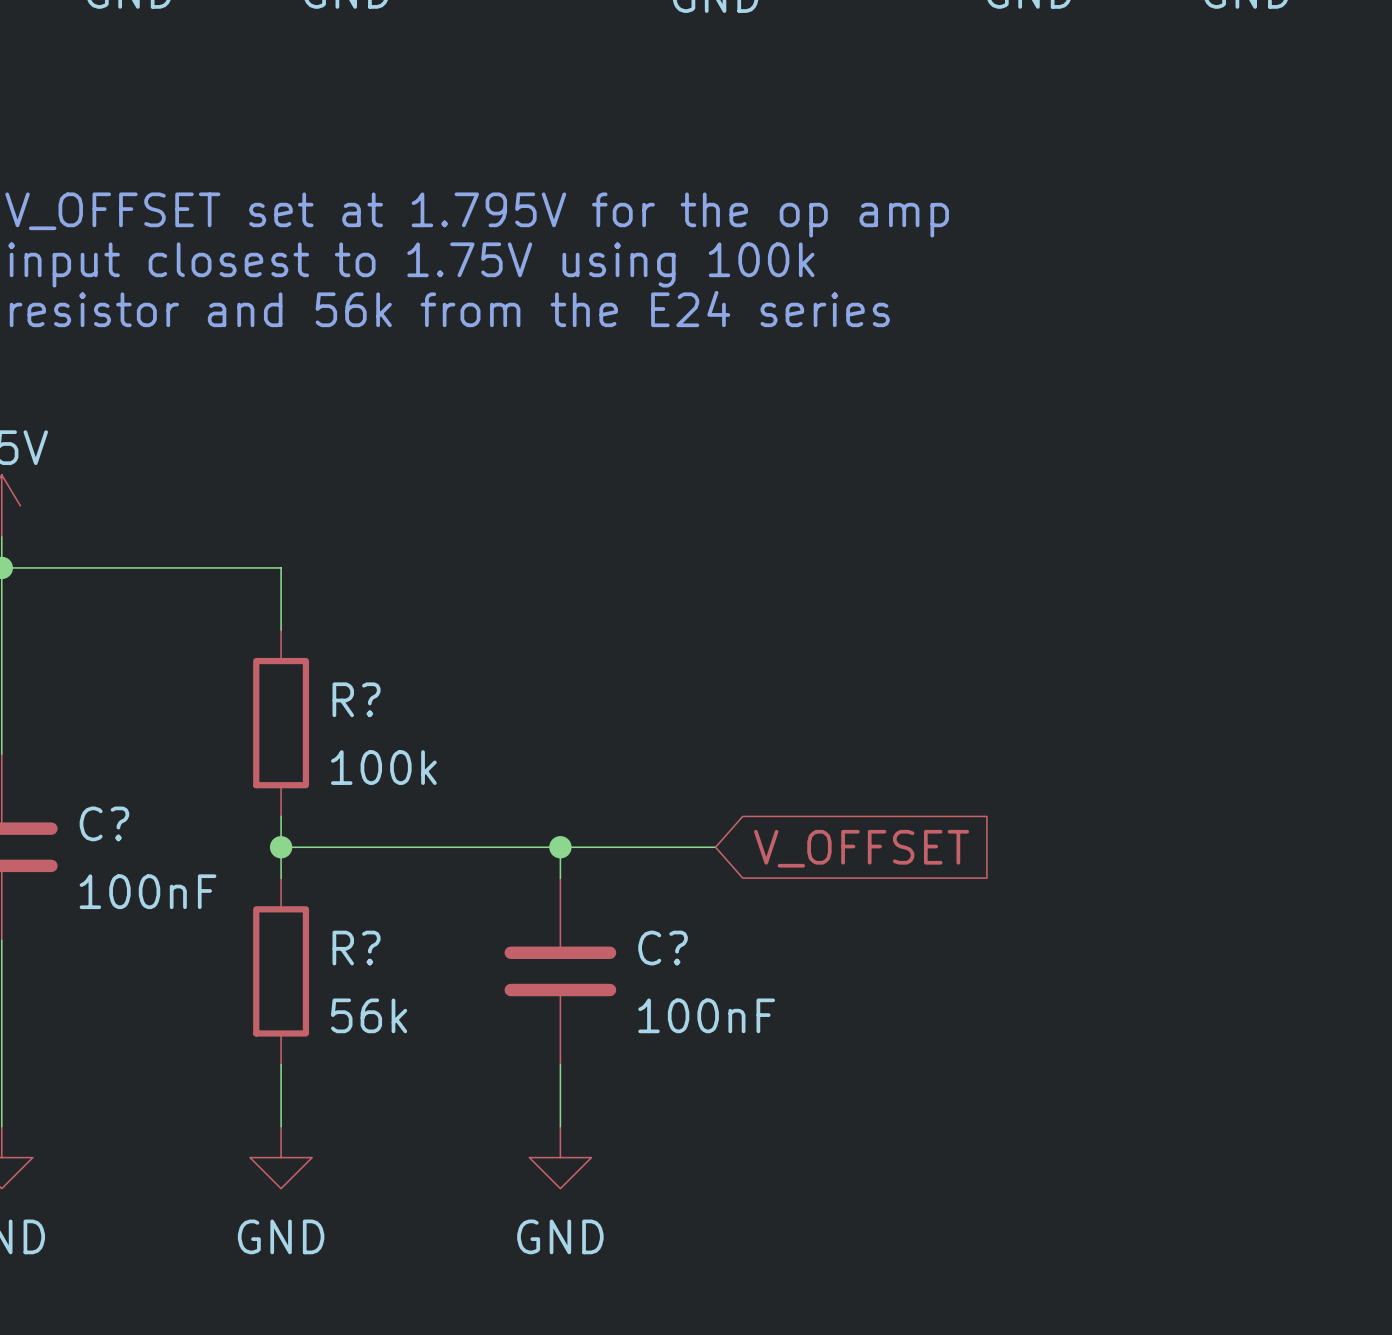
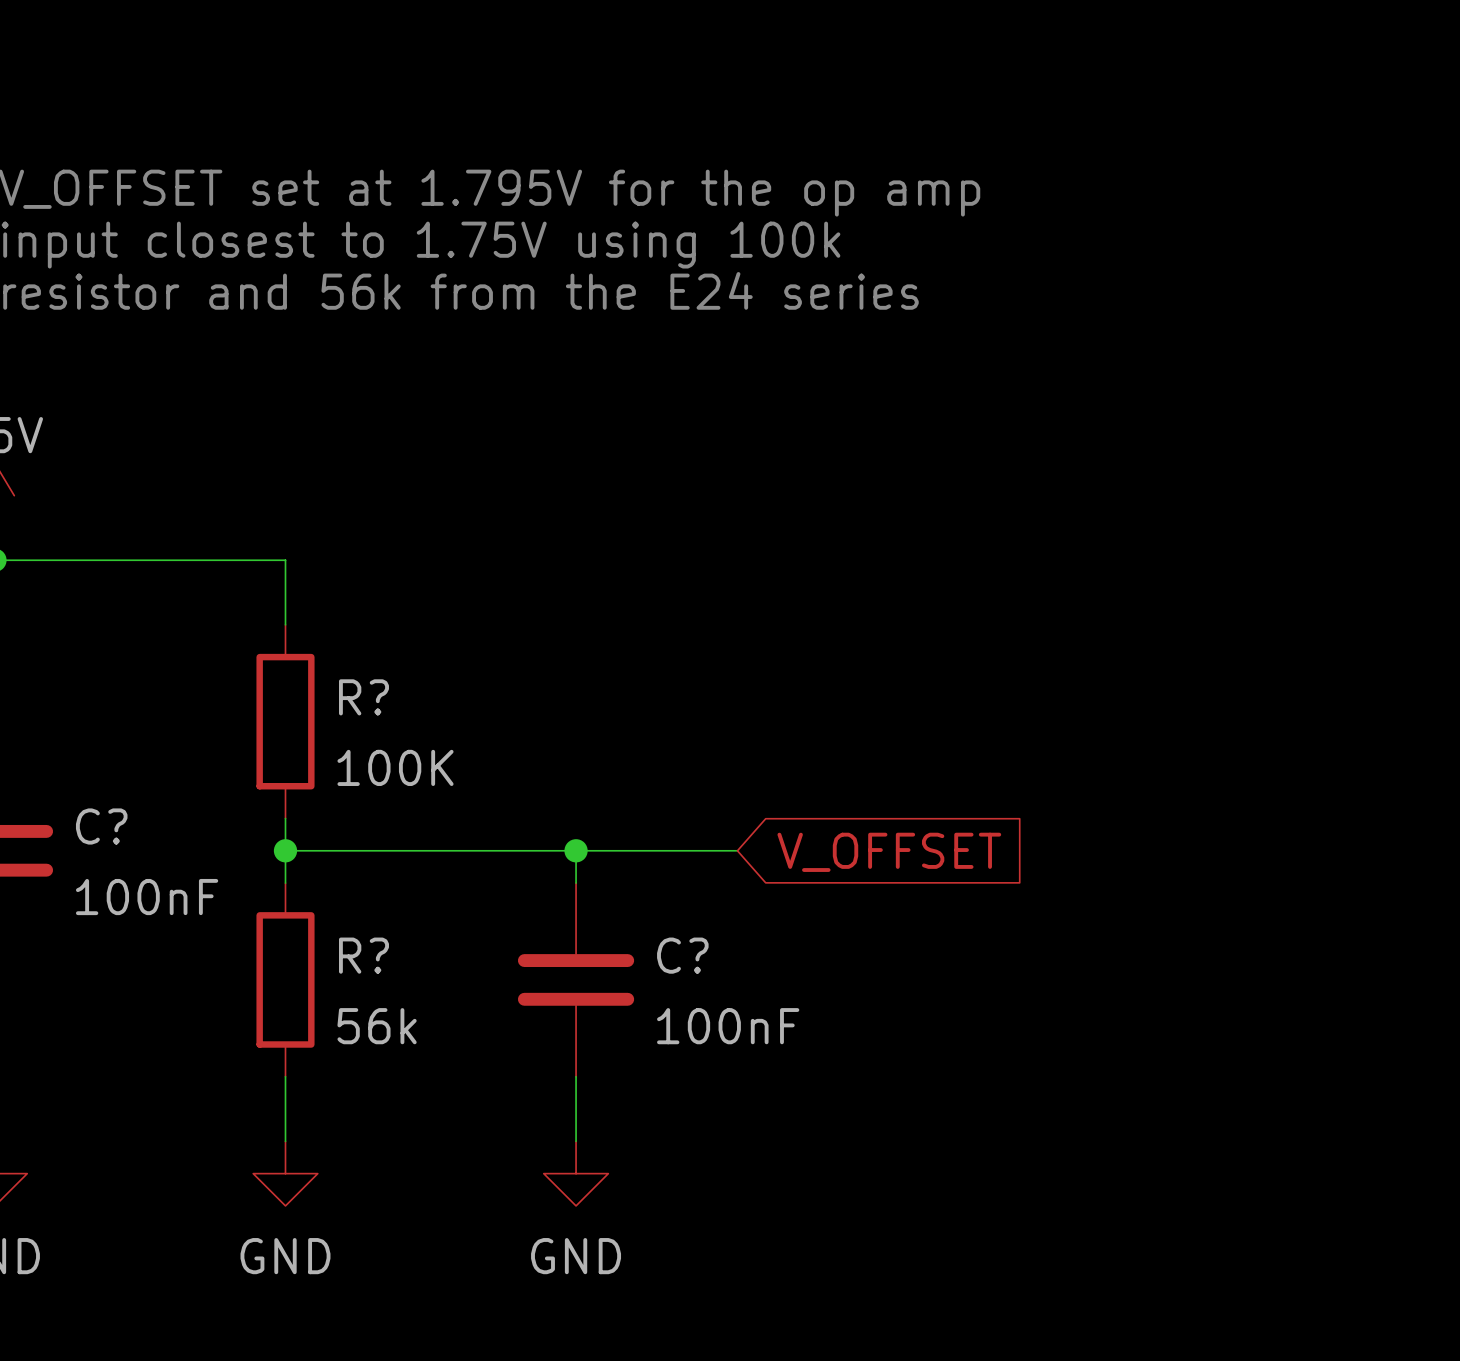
R? value: 100k (383, 767) -> 100K (395, 767)

